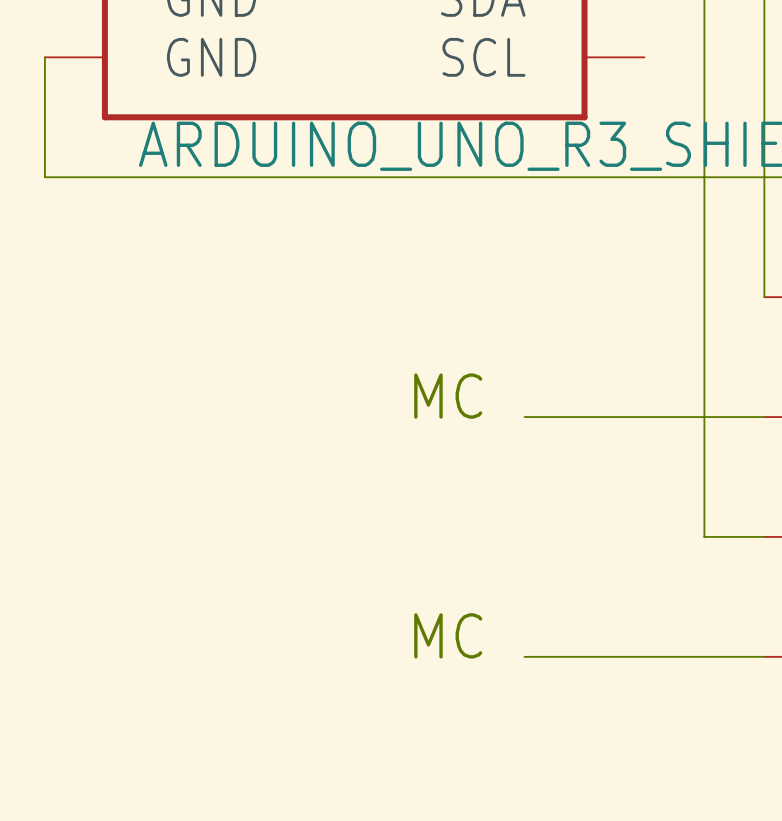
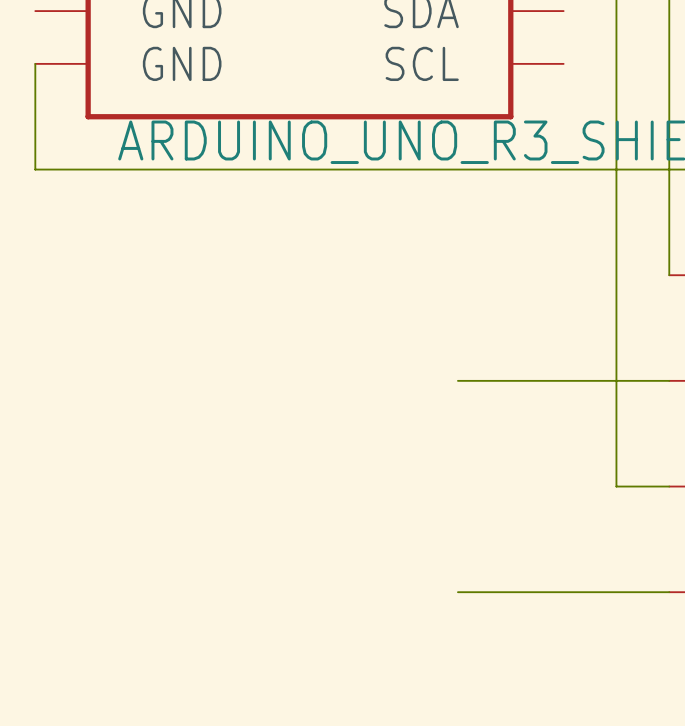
text: MC (448, 396) -> none
text: MC (448, 635) -> none

